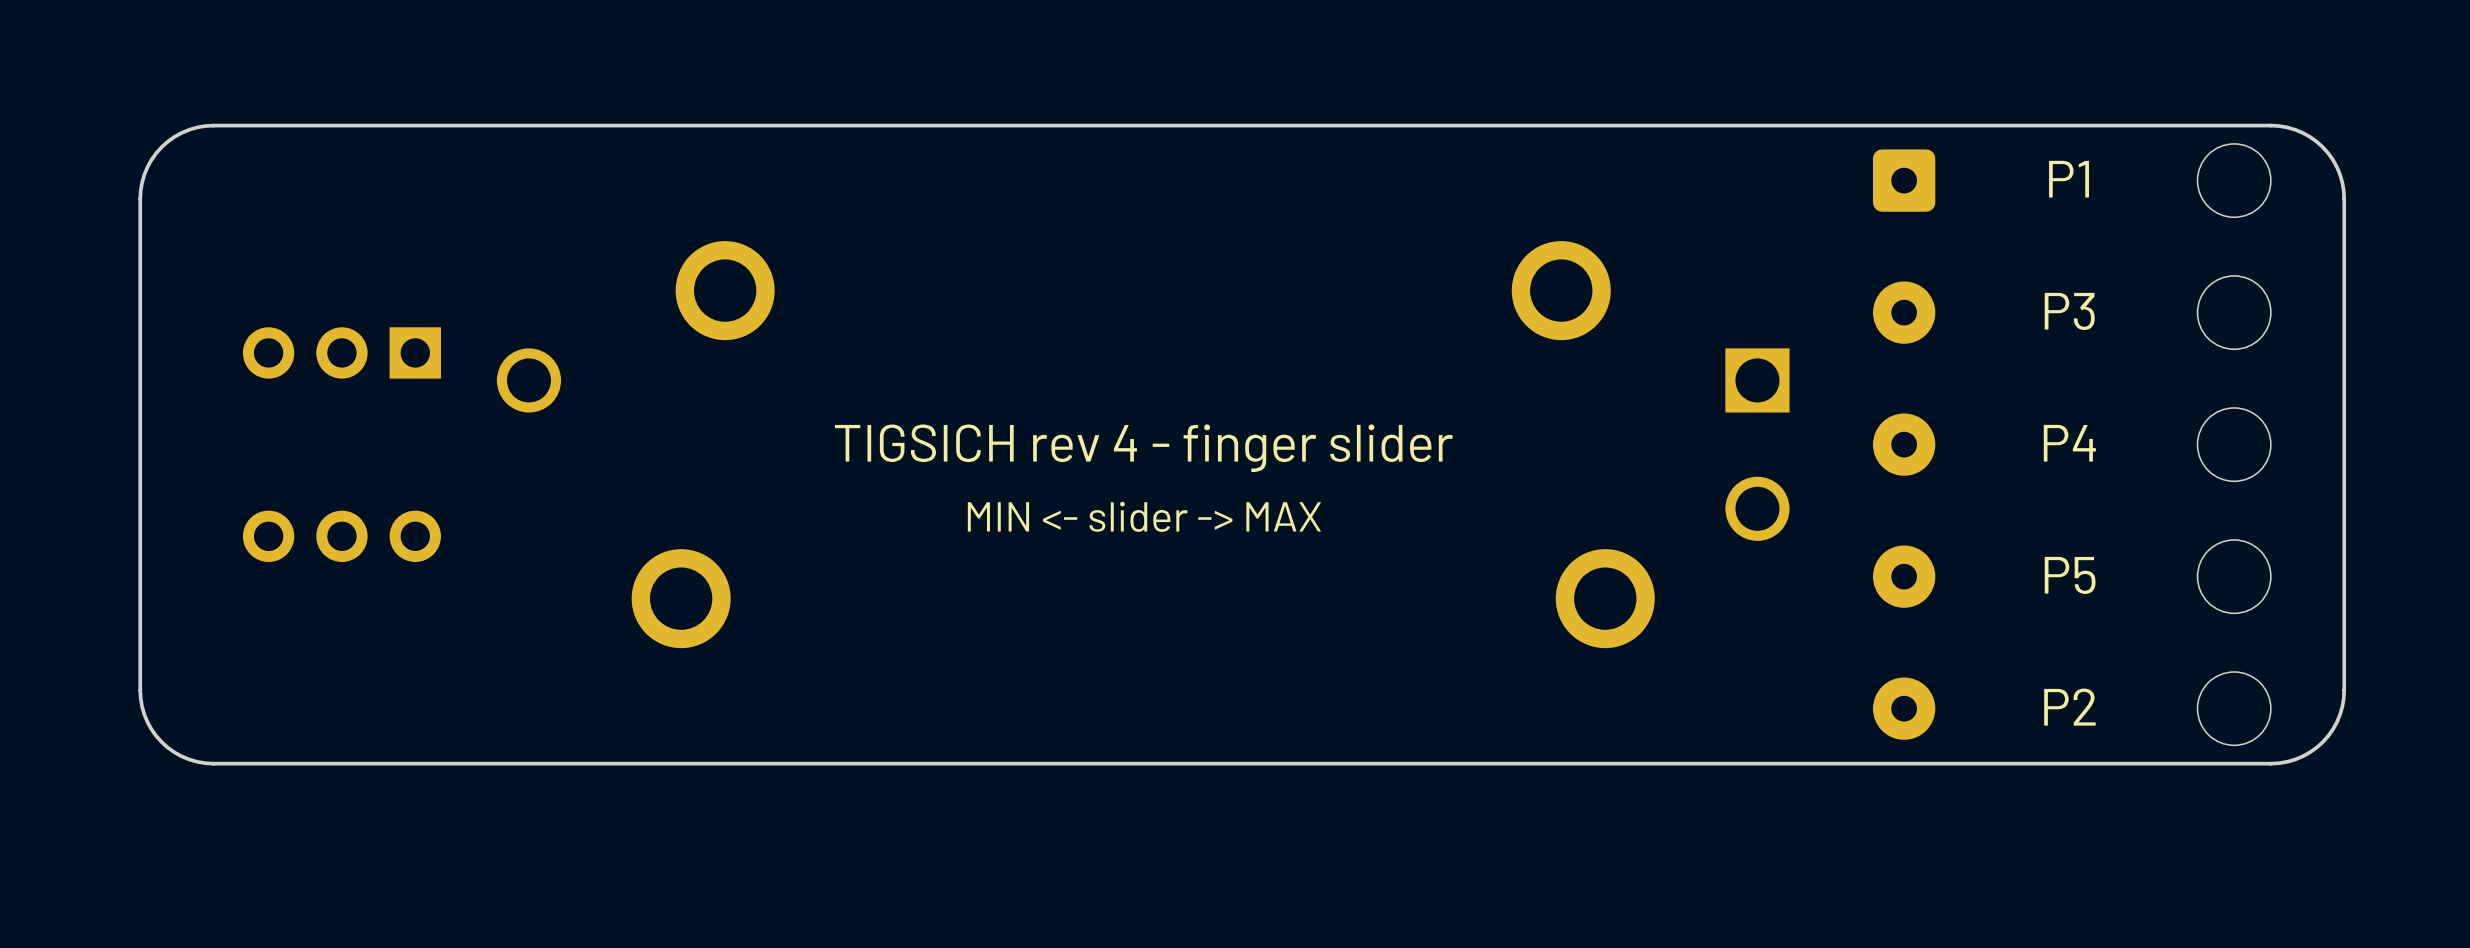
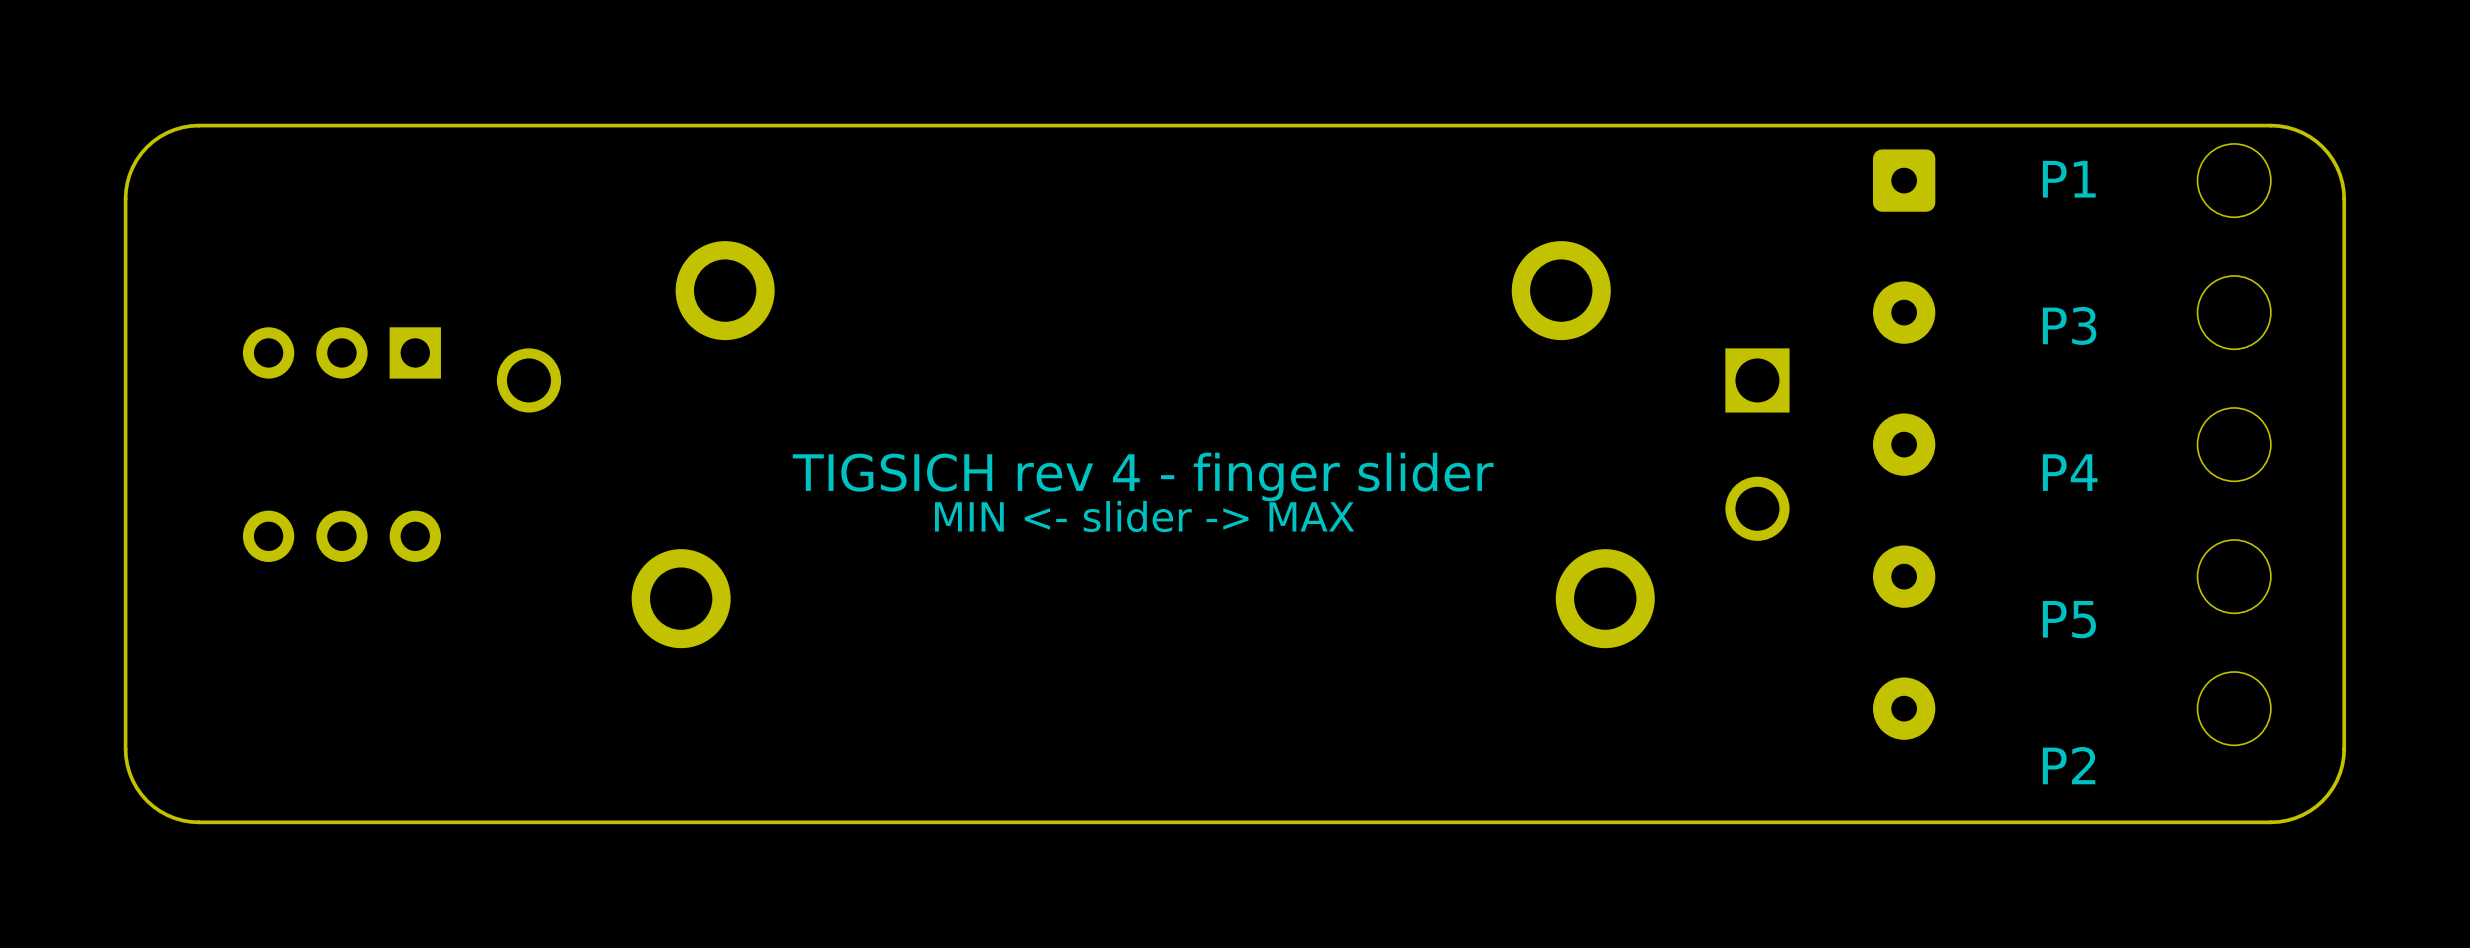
board edge: (213, 125) (197, 127) (181, 132) (161, 147) (147, 167) (142, 182) (140, 198) (140, 698) (144, 714) (156, 736) (174, 752) (197, 761) (213, 763) (2270, 763) (2295, 759) (2309, 752) (2322, 742) (2332, 729) (2340, 714) (2344, 690) -> (213, 125) (182, 127) (167, 132) (153, 141) (141, 153) (132, 167) (127, 182) (125, 198) (126, 757) (132, 780) (147, 800) (159, 811) (182, 820) (198, 822) (2279, 821) (2295, 818) (2316, 806) (2328, 794) (2336, 780) (2343, 757) (2344, 690)
text position: P3 (2069, 311) -> P3 (2069, 325)
text position: P4 (2069, 443) -> P4 (2070, 472)
text position: TIGSICH rev 4 - finger slider (1143, 448) -> TIGSICH rev 4 - finger slider (1143, 477)
text position: P5 (2070, 575) -> P5 (2069, 619)
text position: P2 (2069, 707) -> P2 (2069, 765)

